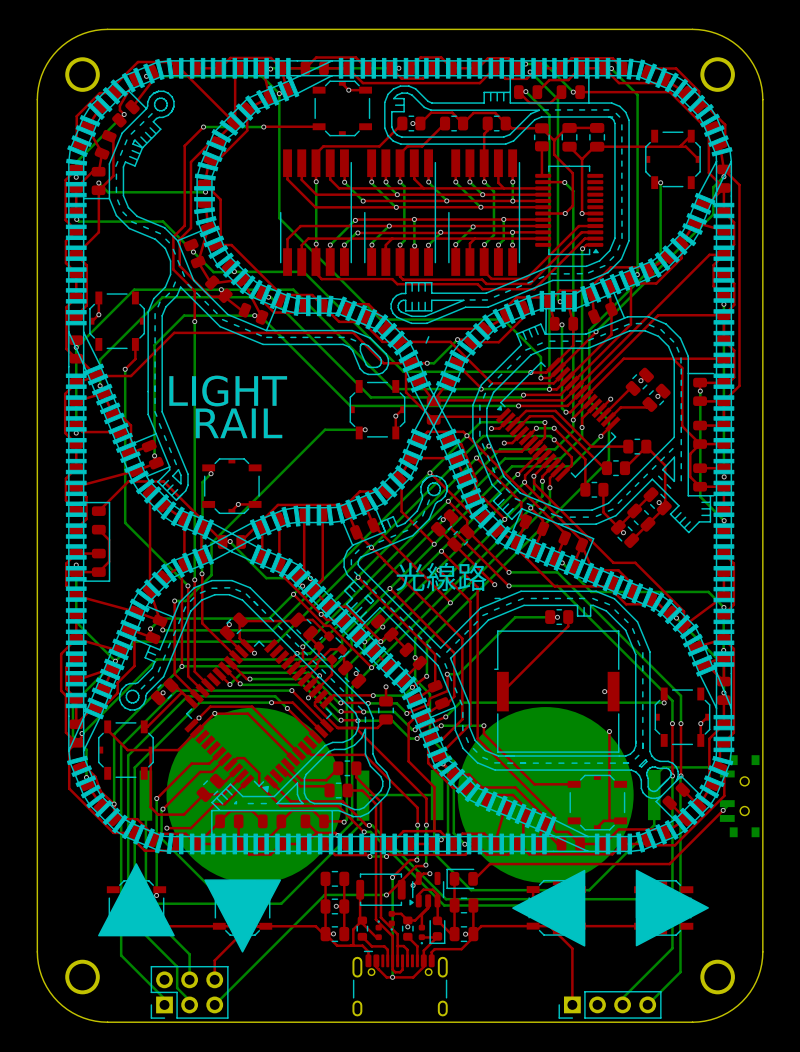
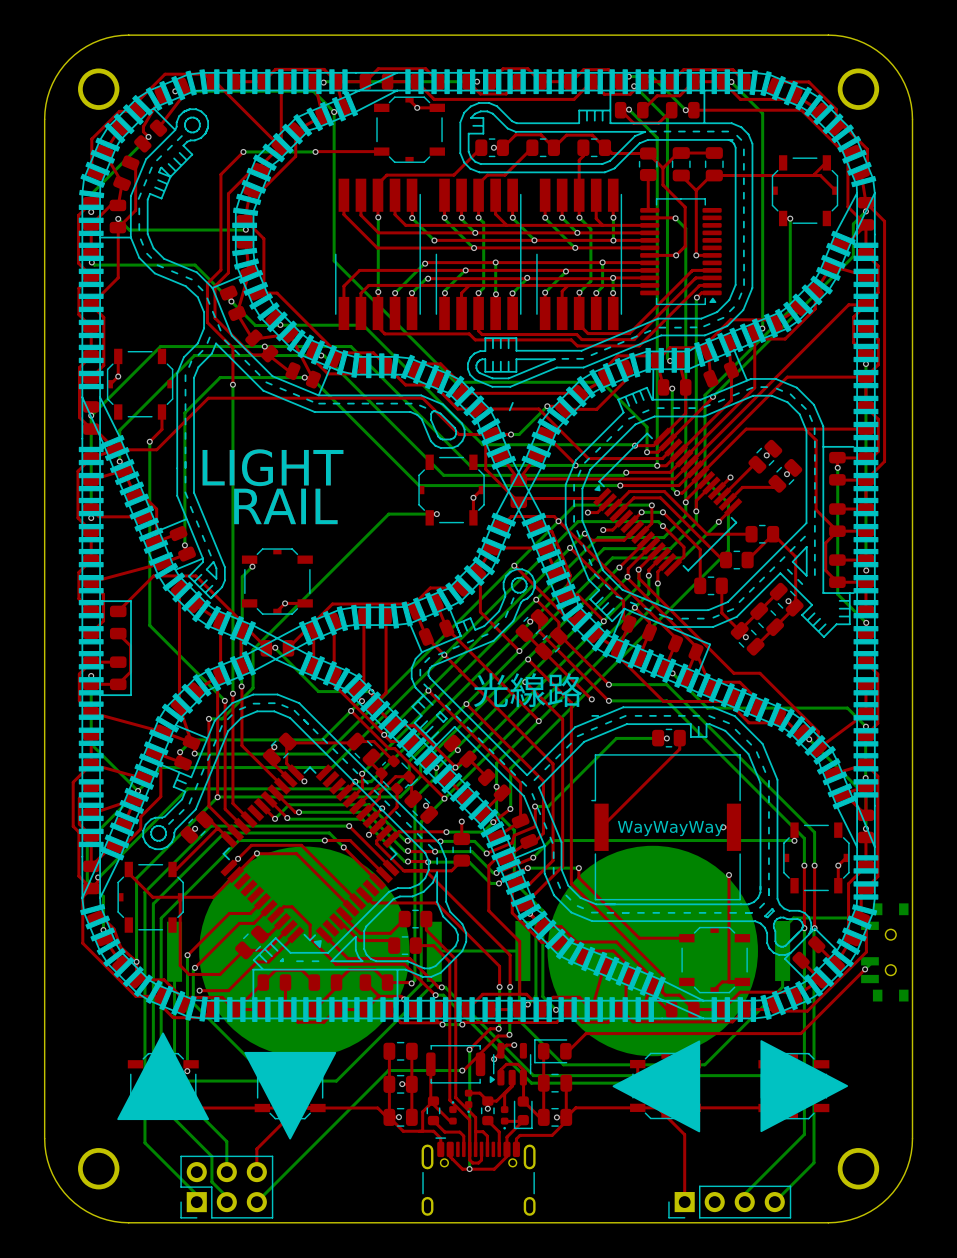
text: none -> WayWayWay (670, 828)

